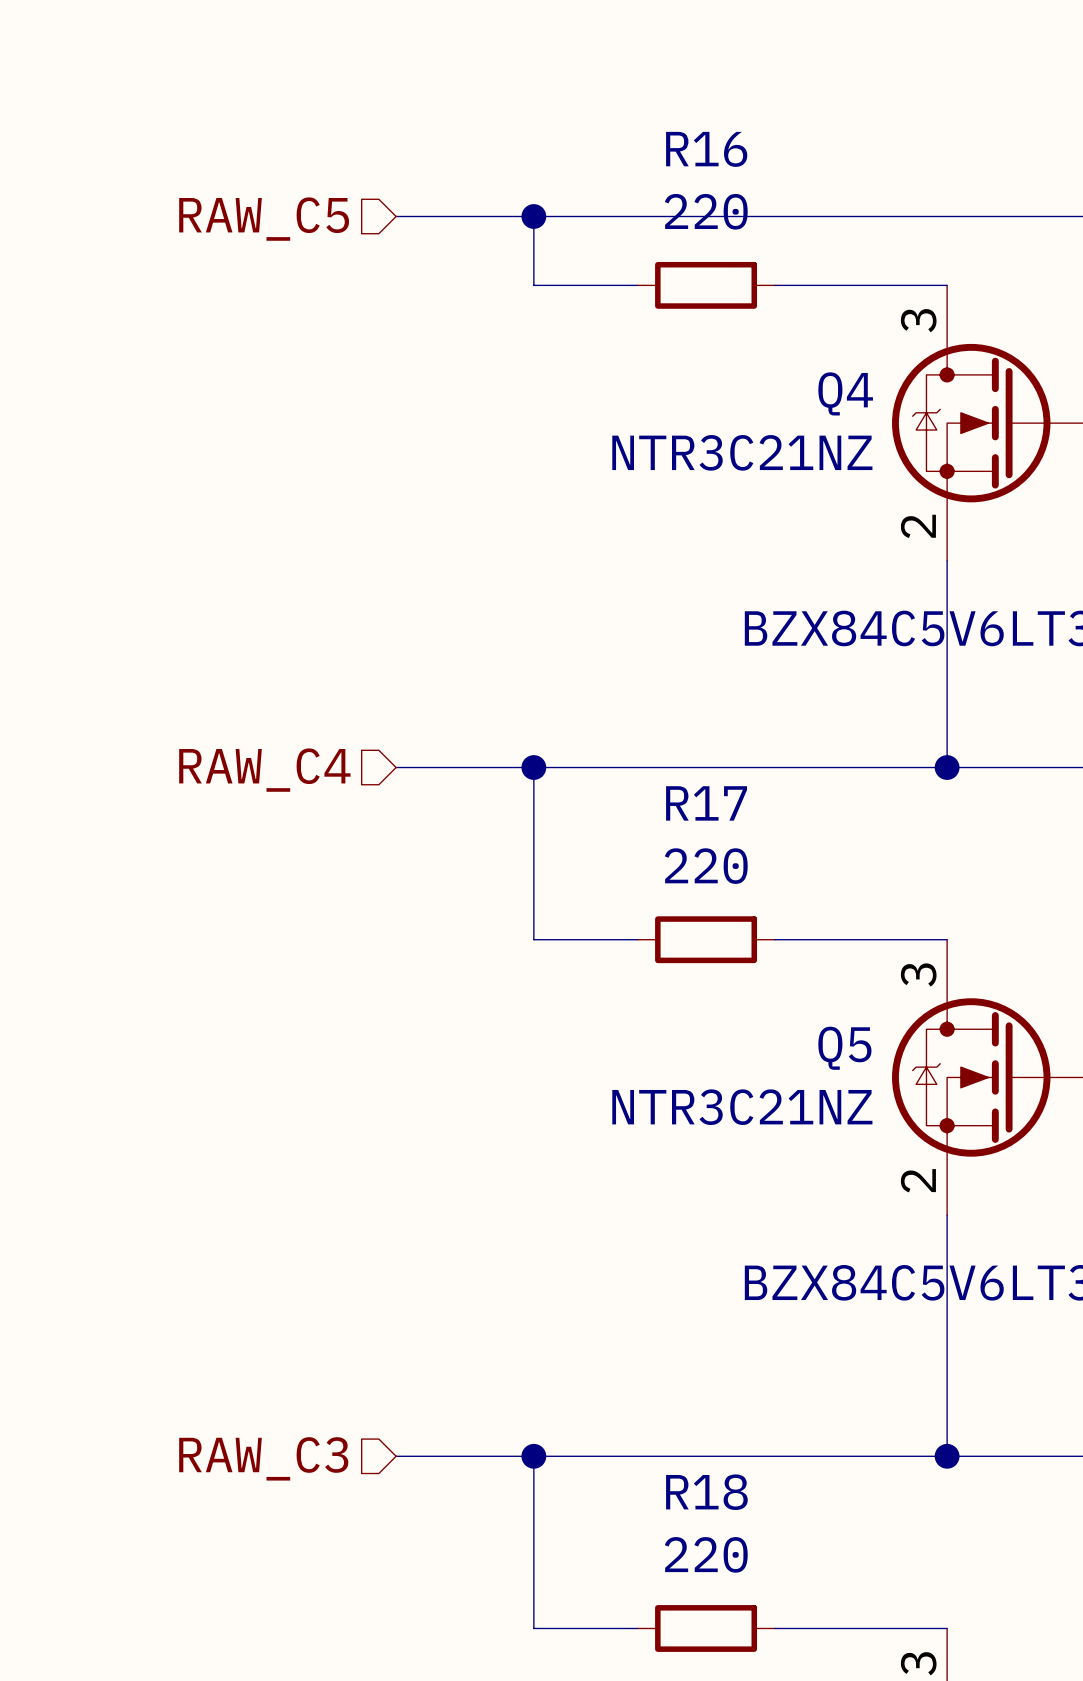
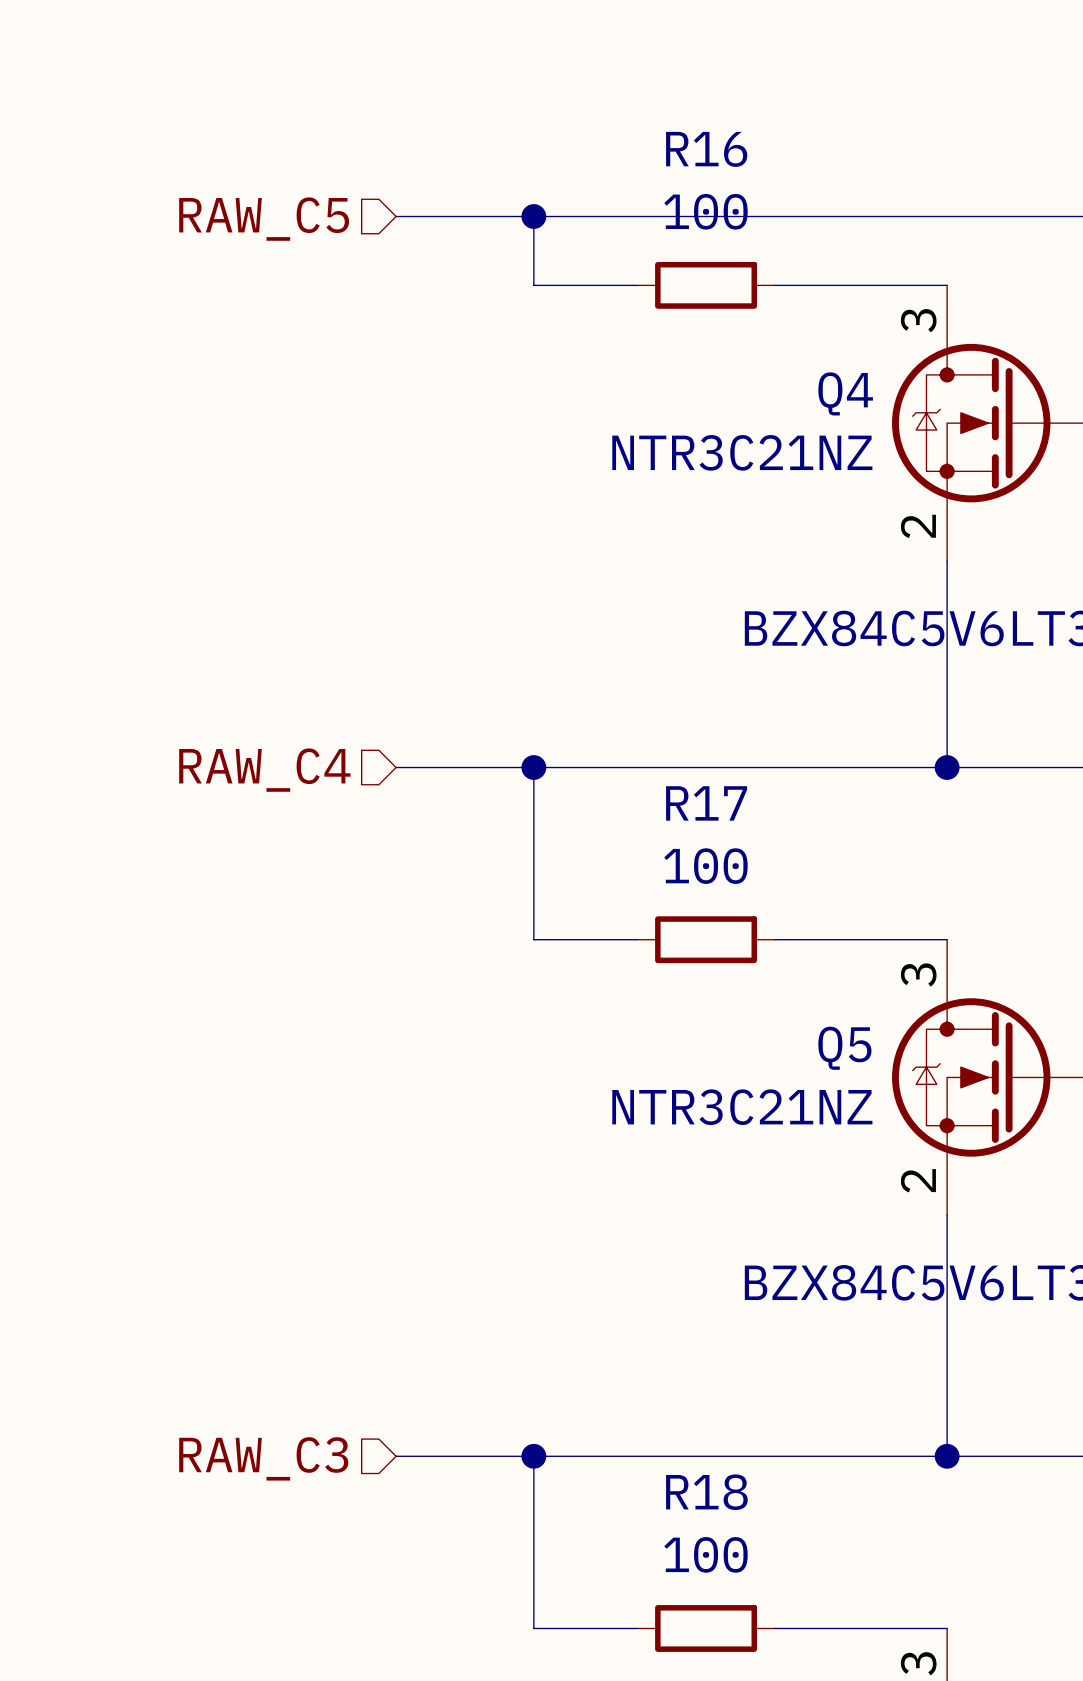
R16 value: 220 (706, 211) -> 100 (705, 211)
R17 value: 220 (706, 866) -> 100 (705, 866)
R18 value: 220 (706, 1554) -> 100 (705, 1554)

